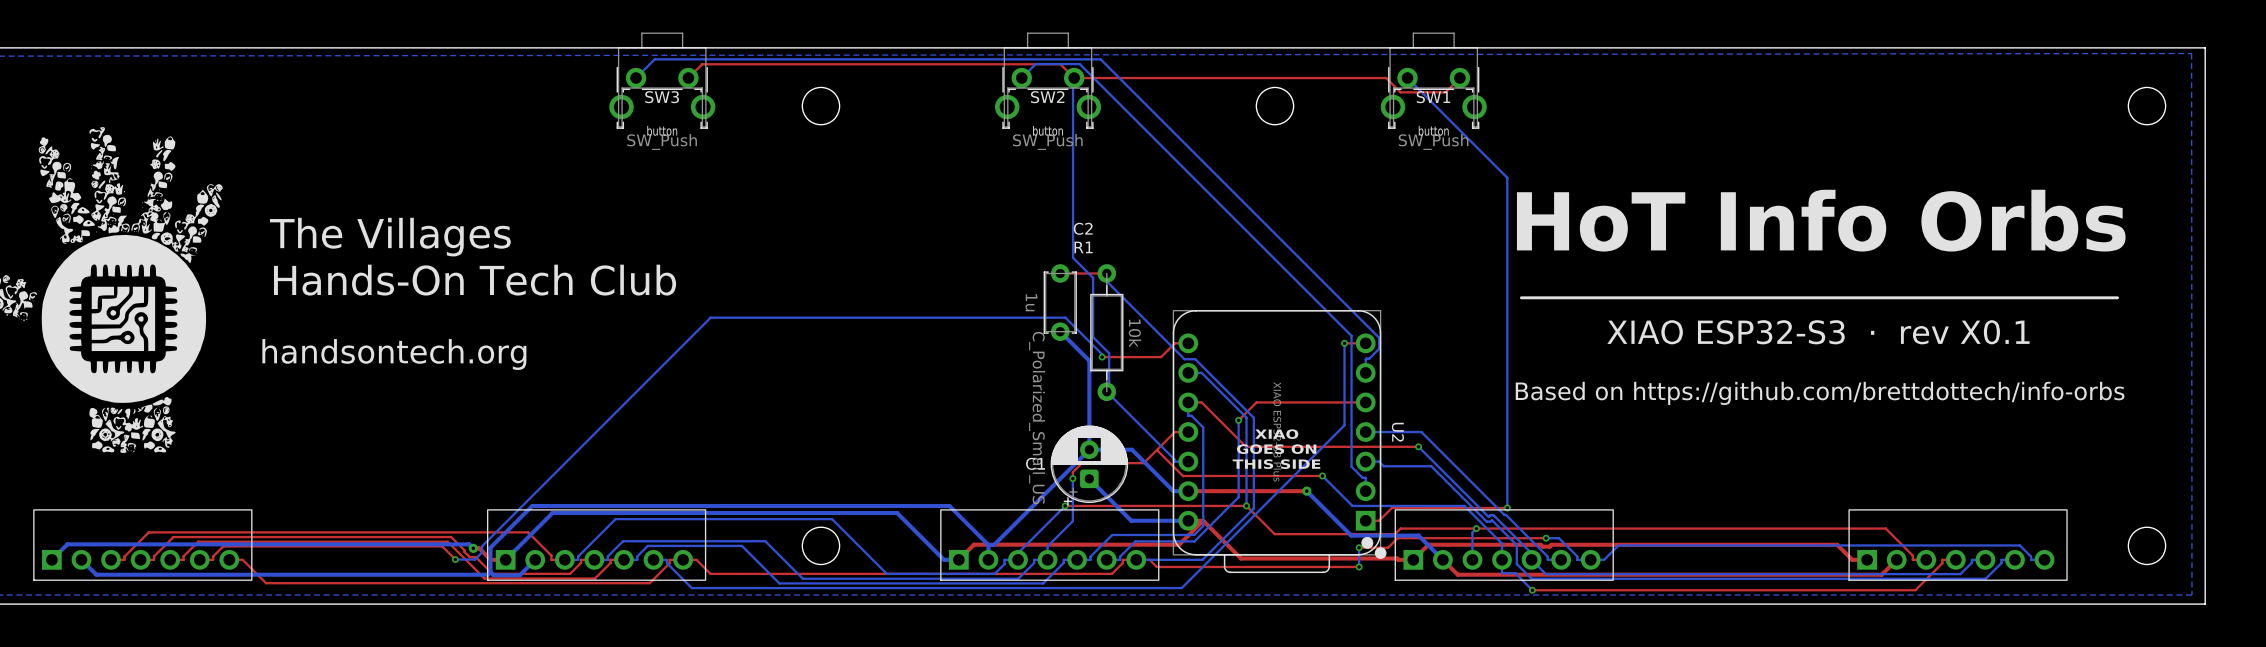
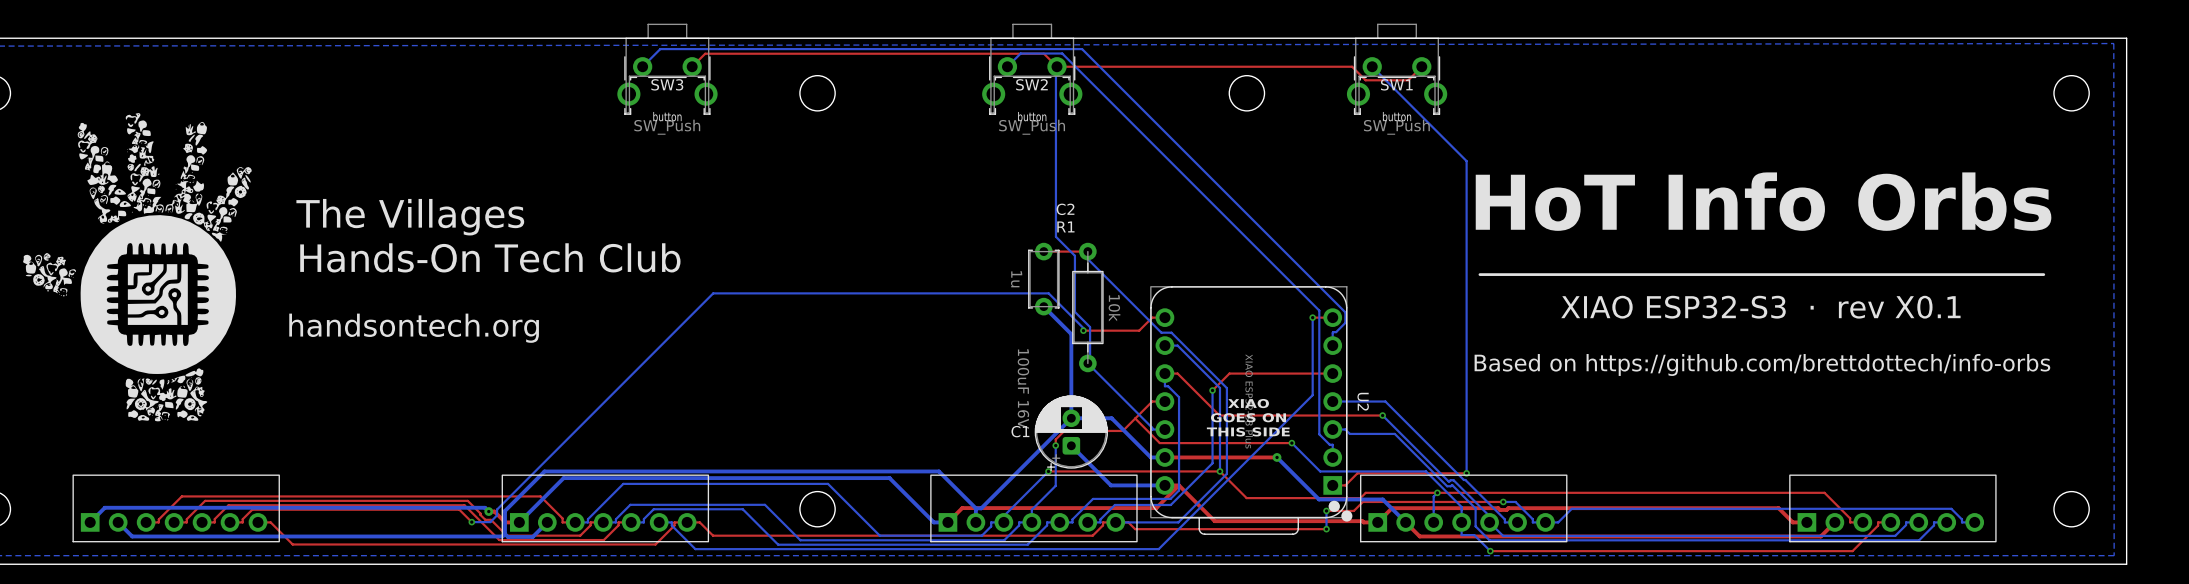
C1 value: C_Polarized_Small_US (1037, 418) -> 100uF 16V (1023, 389)

